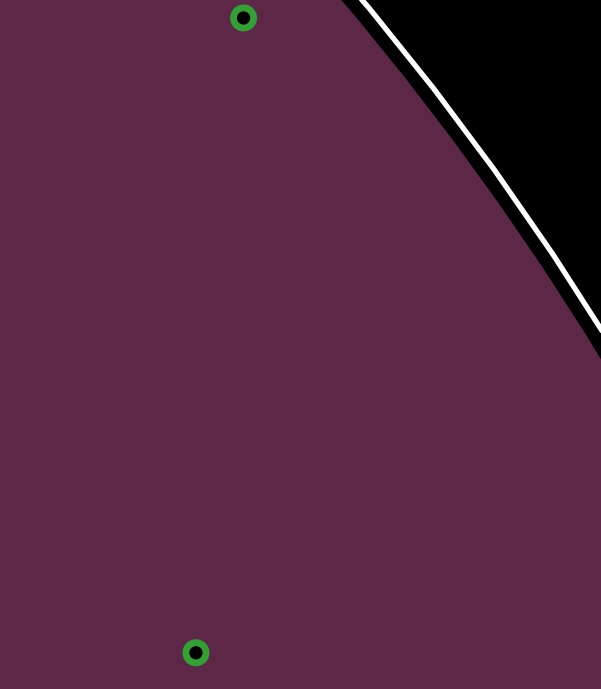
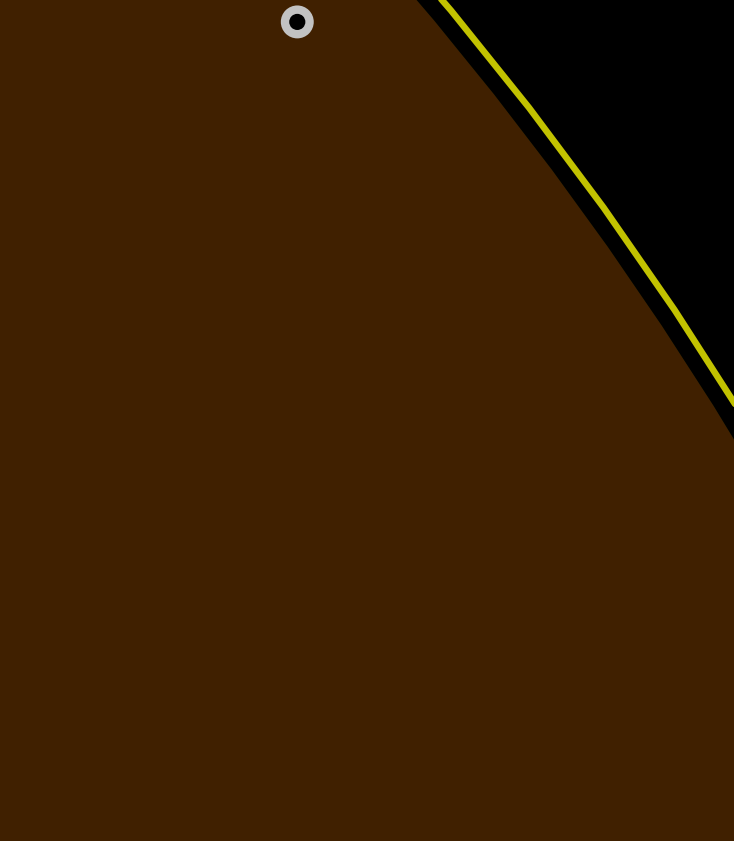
via: (195, 652) -> none

